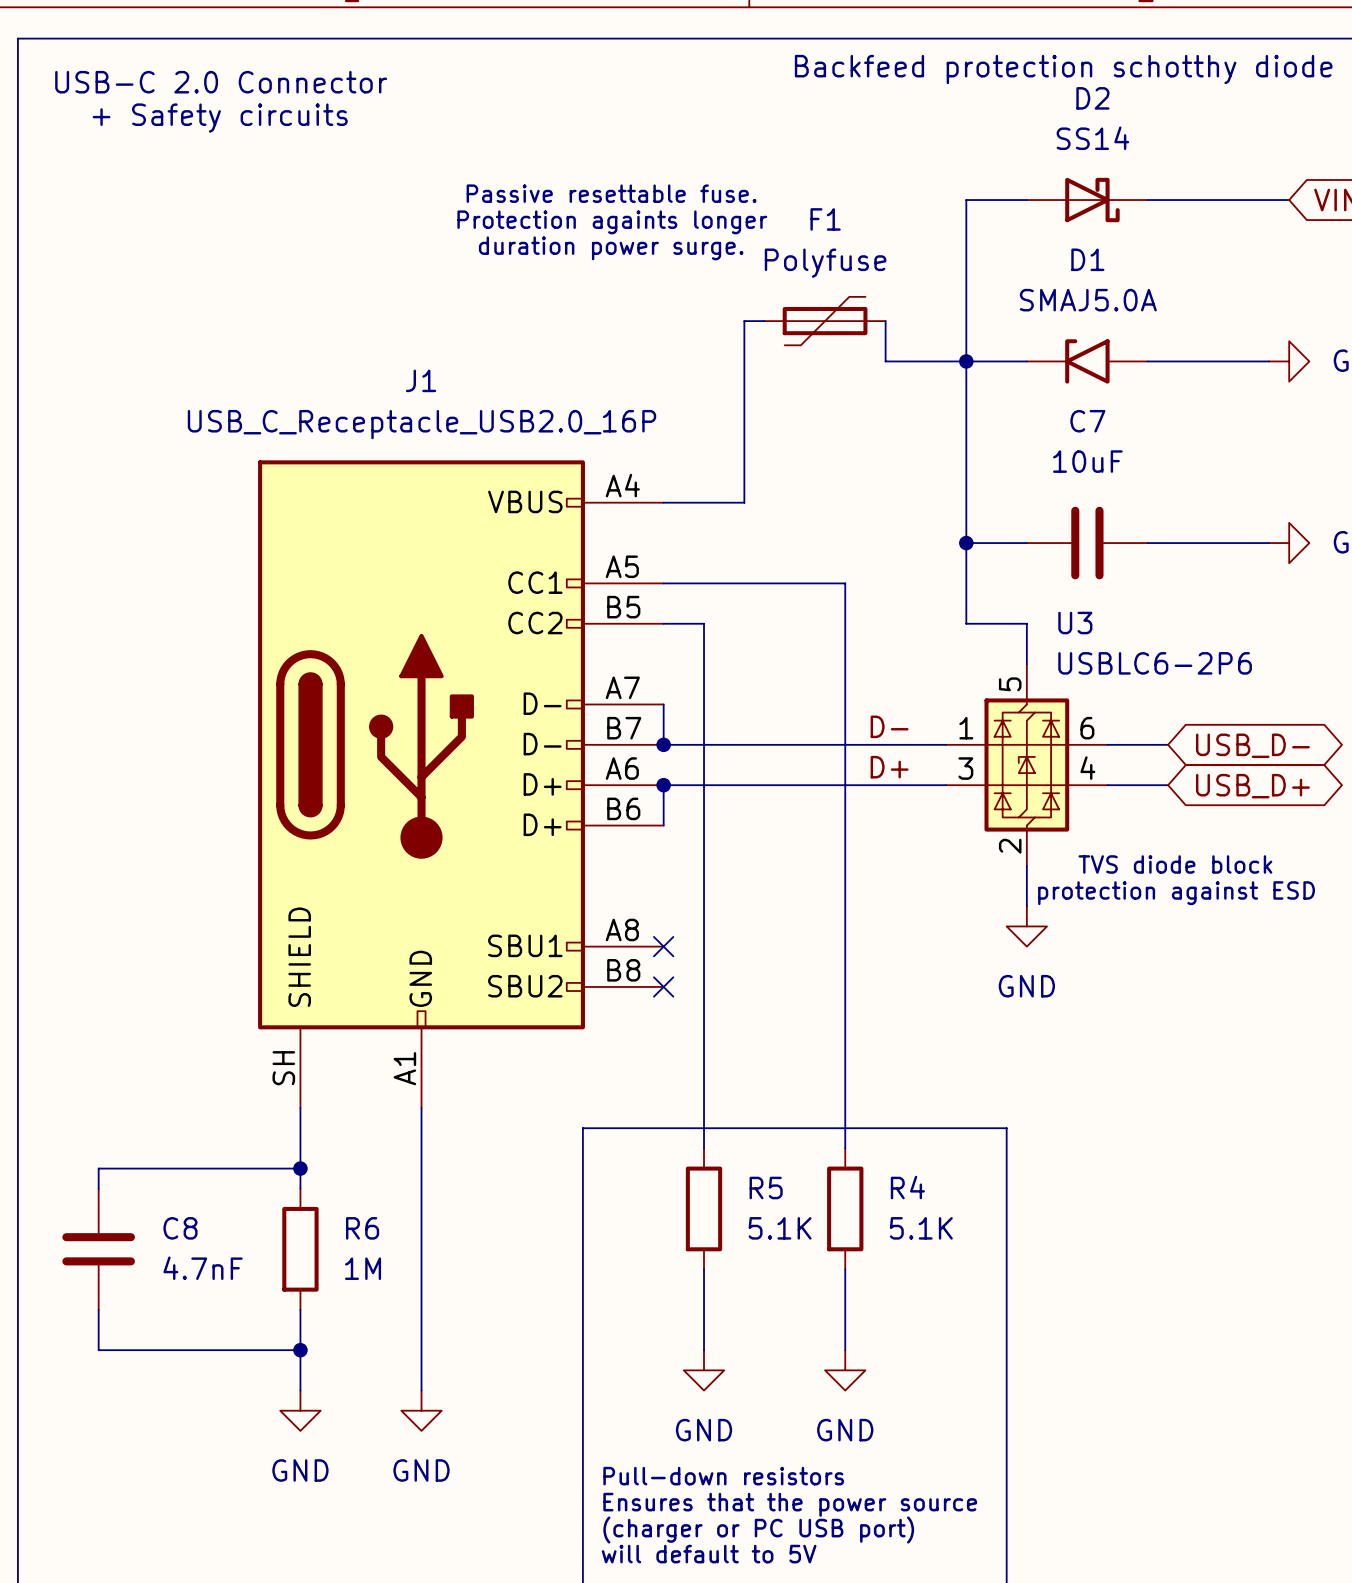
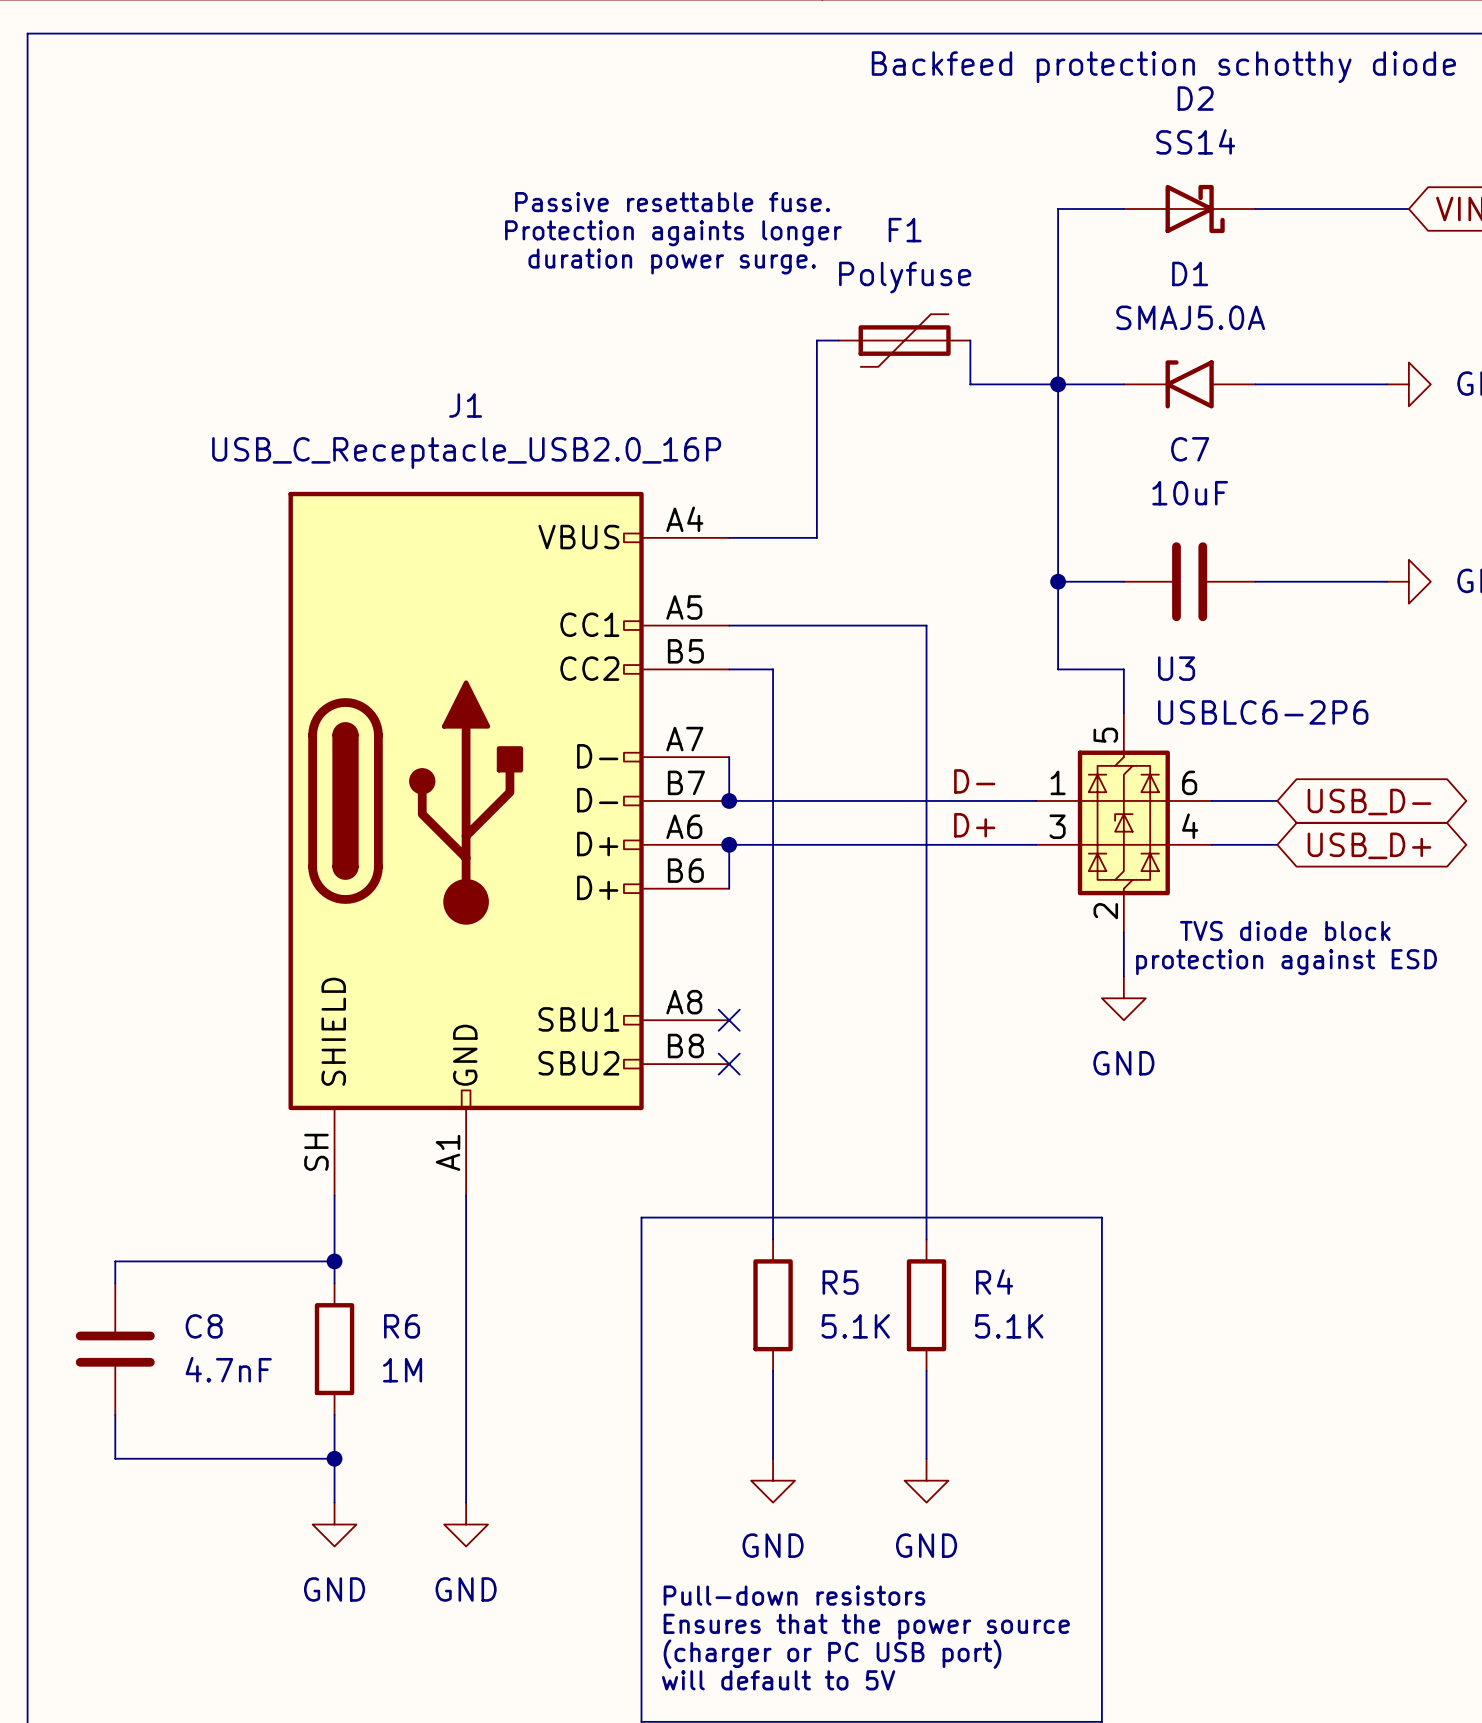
text: USB-C 2.0 Connector (221, 82) -> none
text: + Safety circuits (220, 118) -> none

